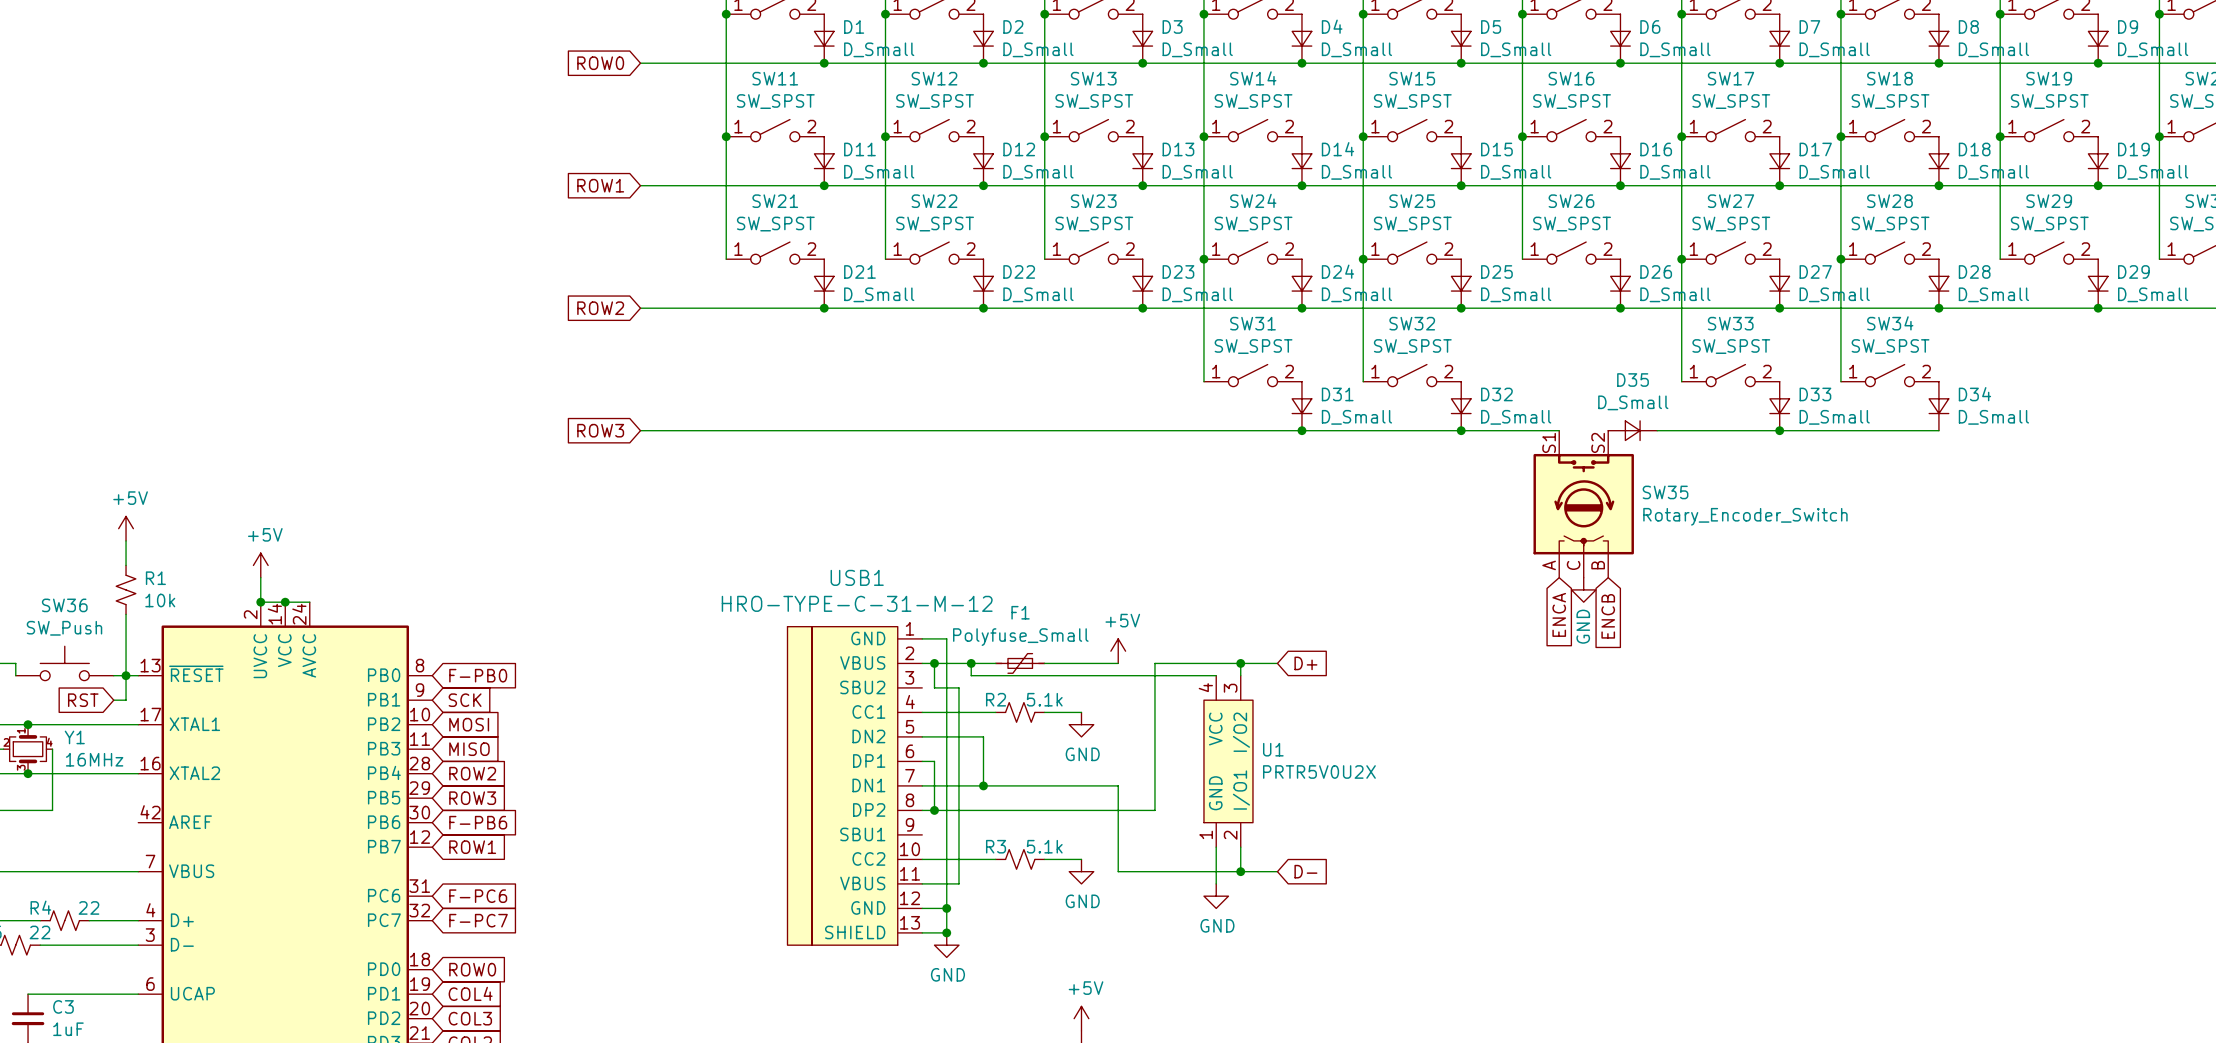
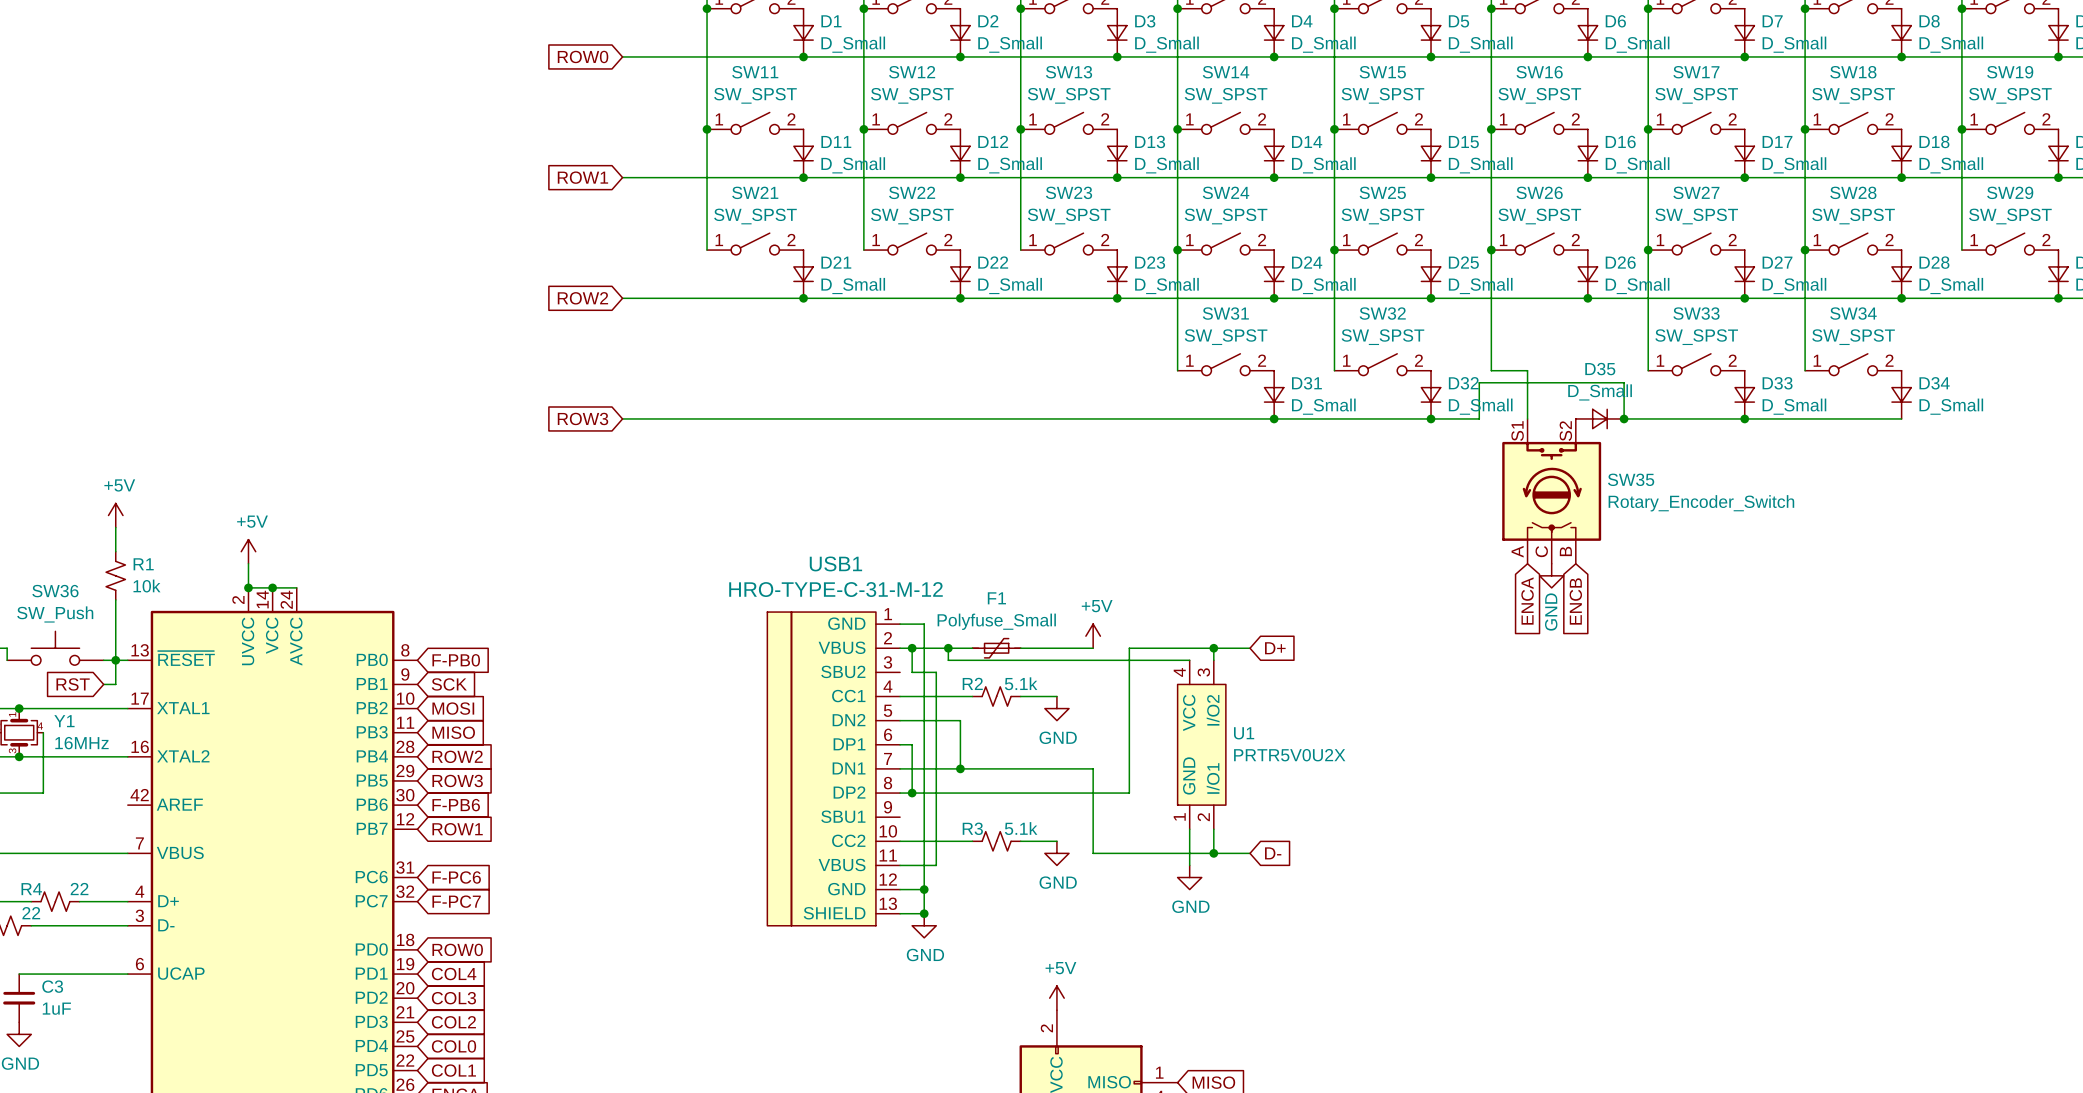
wire: none -> (1491, 250) (1491, 370) (1527, 370) (1527, 418)
junction: none -> (1491, 250)
wire: (1510, 430) (1559, 430) -> (1479, 418) (1479, 382) (1624, 382) (1624, 418)
junction: none -> (1624, 418)

